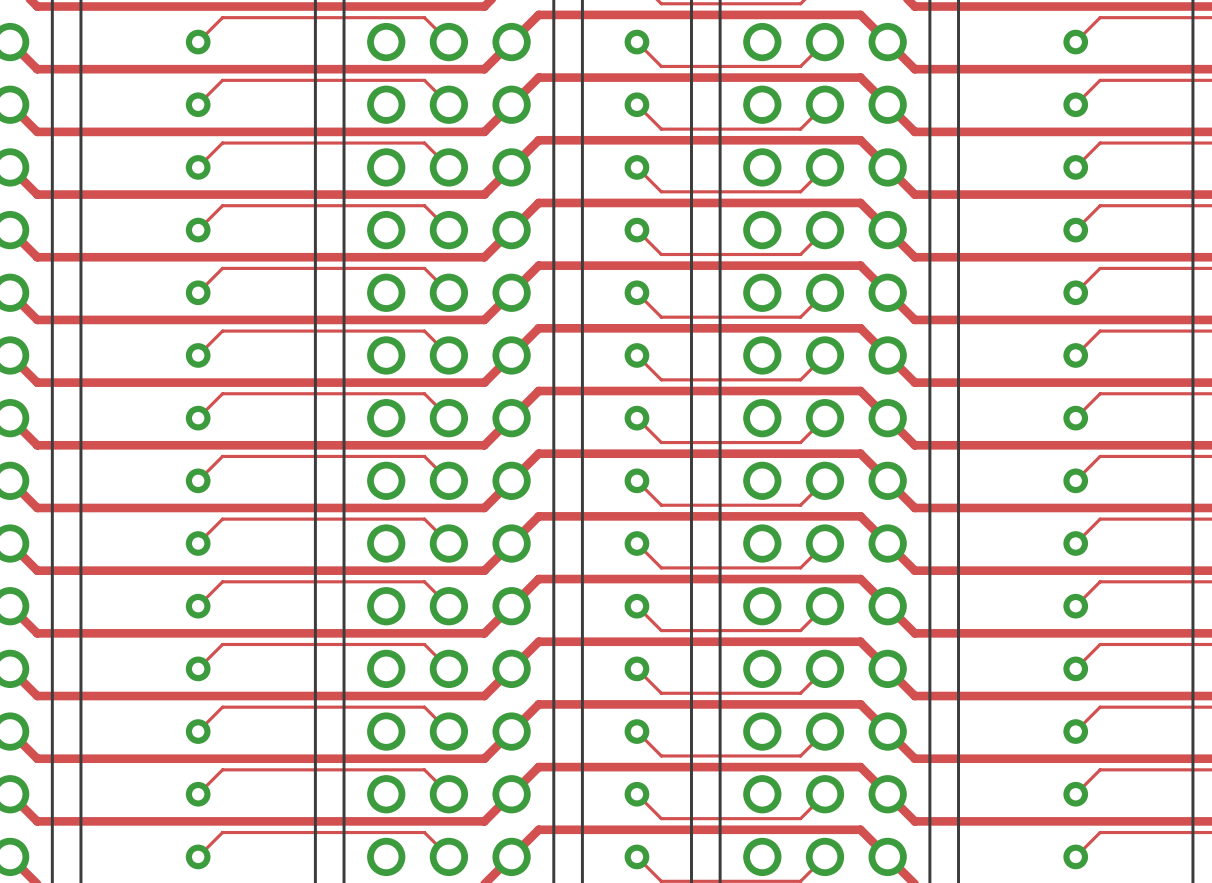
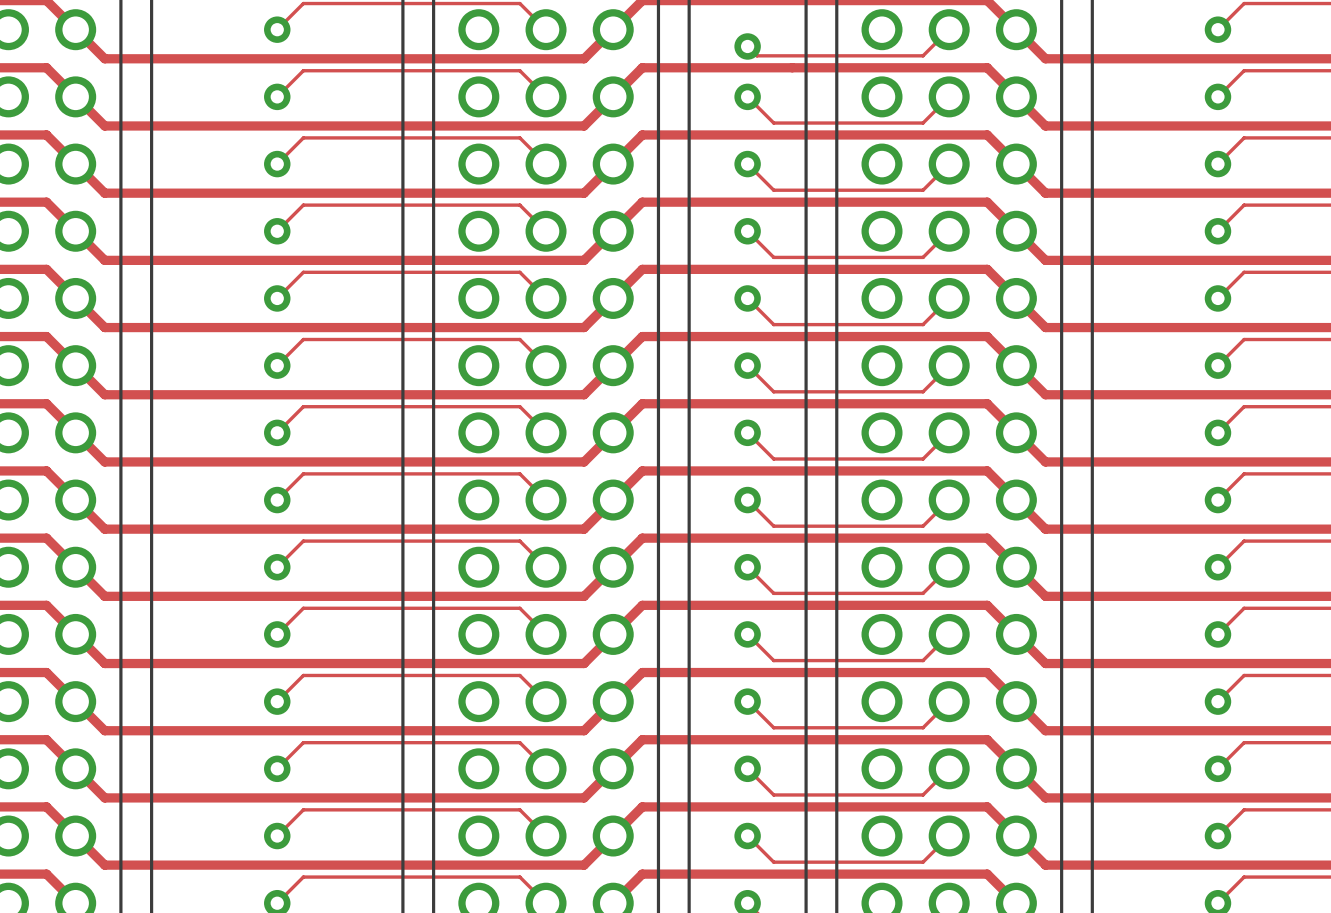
track: (636, 42) (661, 66) -> (747, 46) (756, 55) (773, 55)
via position: (636, 42) -> (747, 46)

